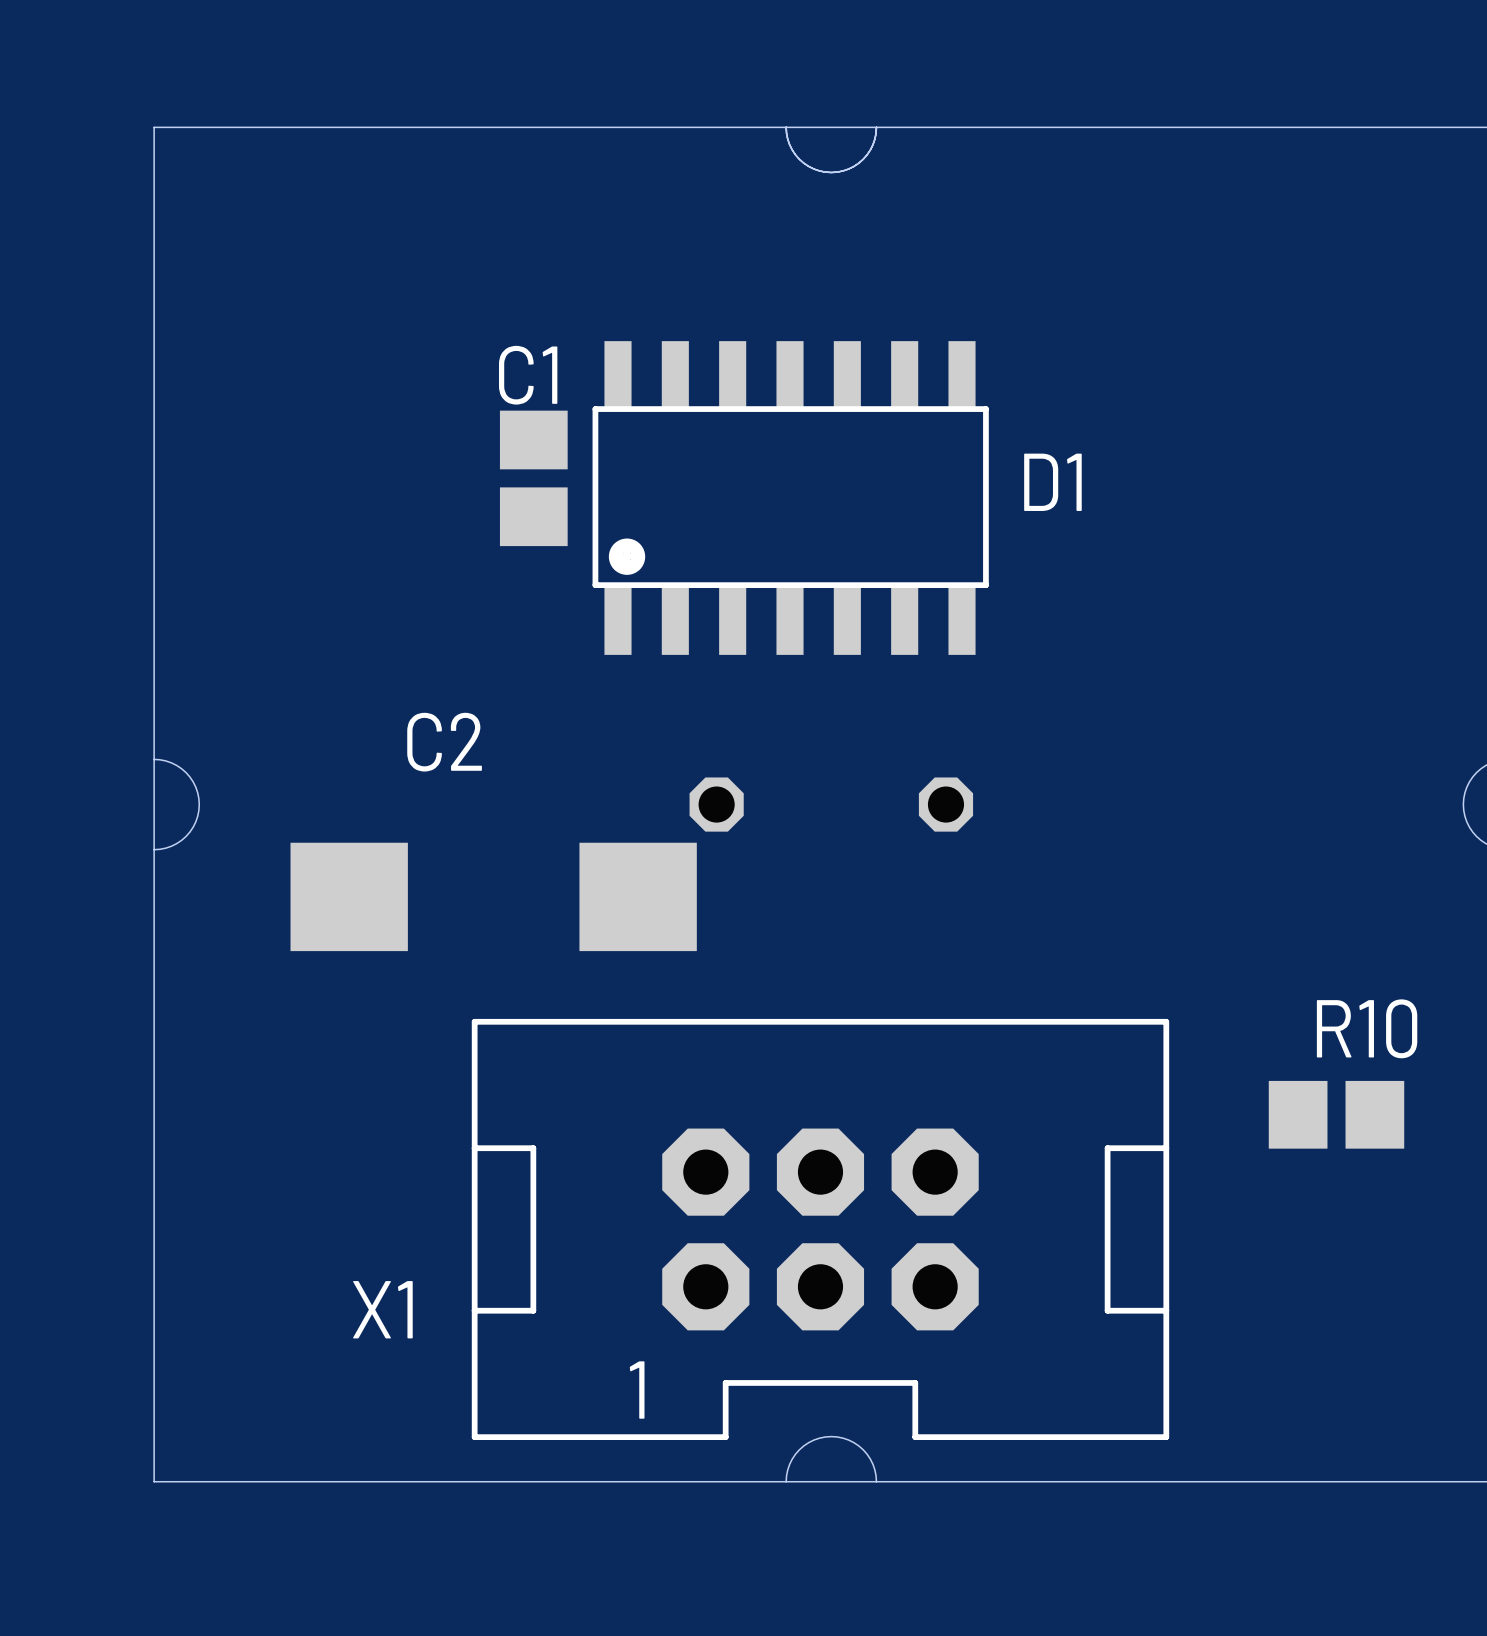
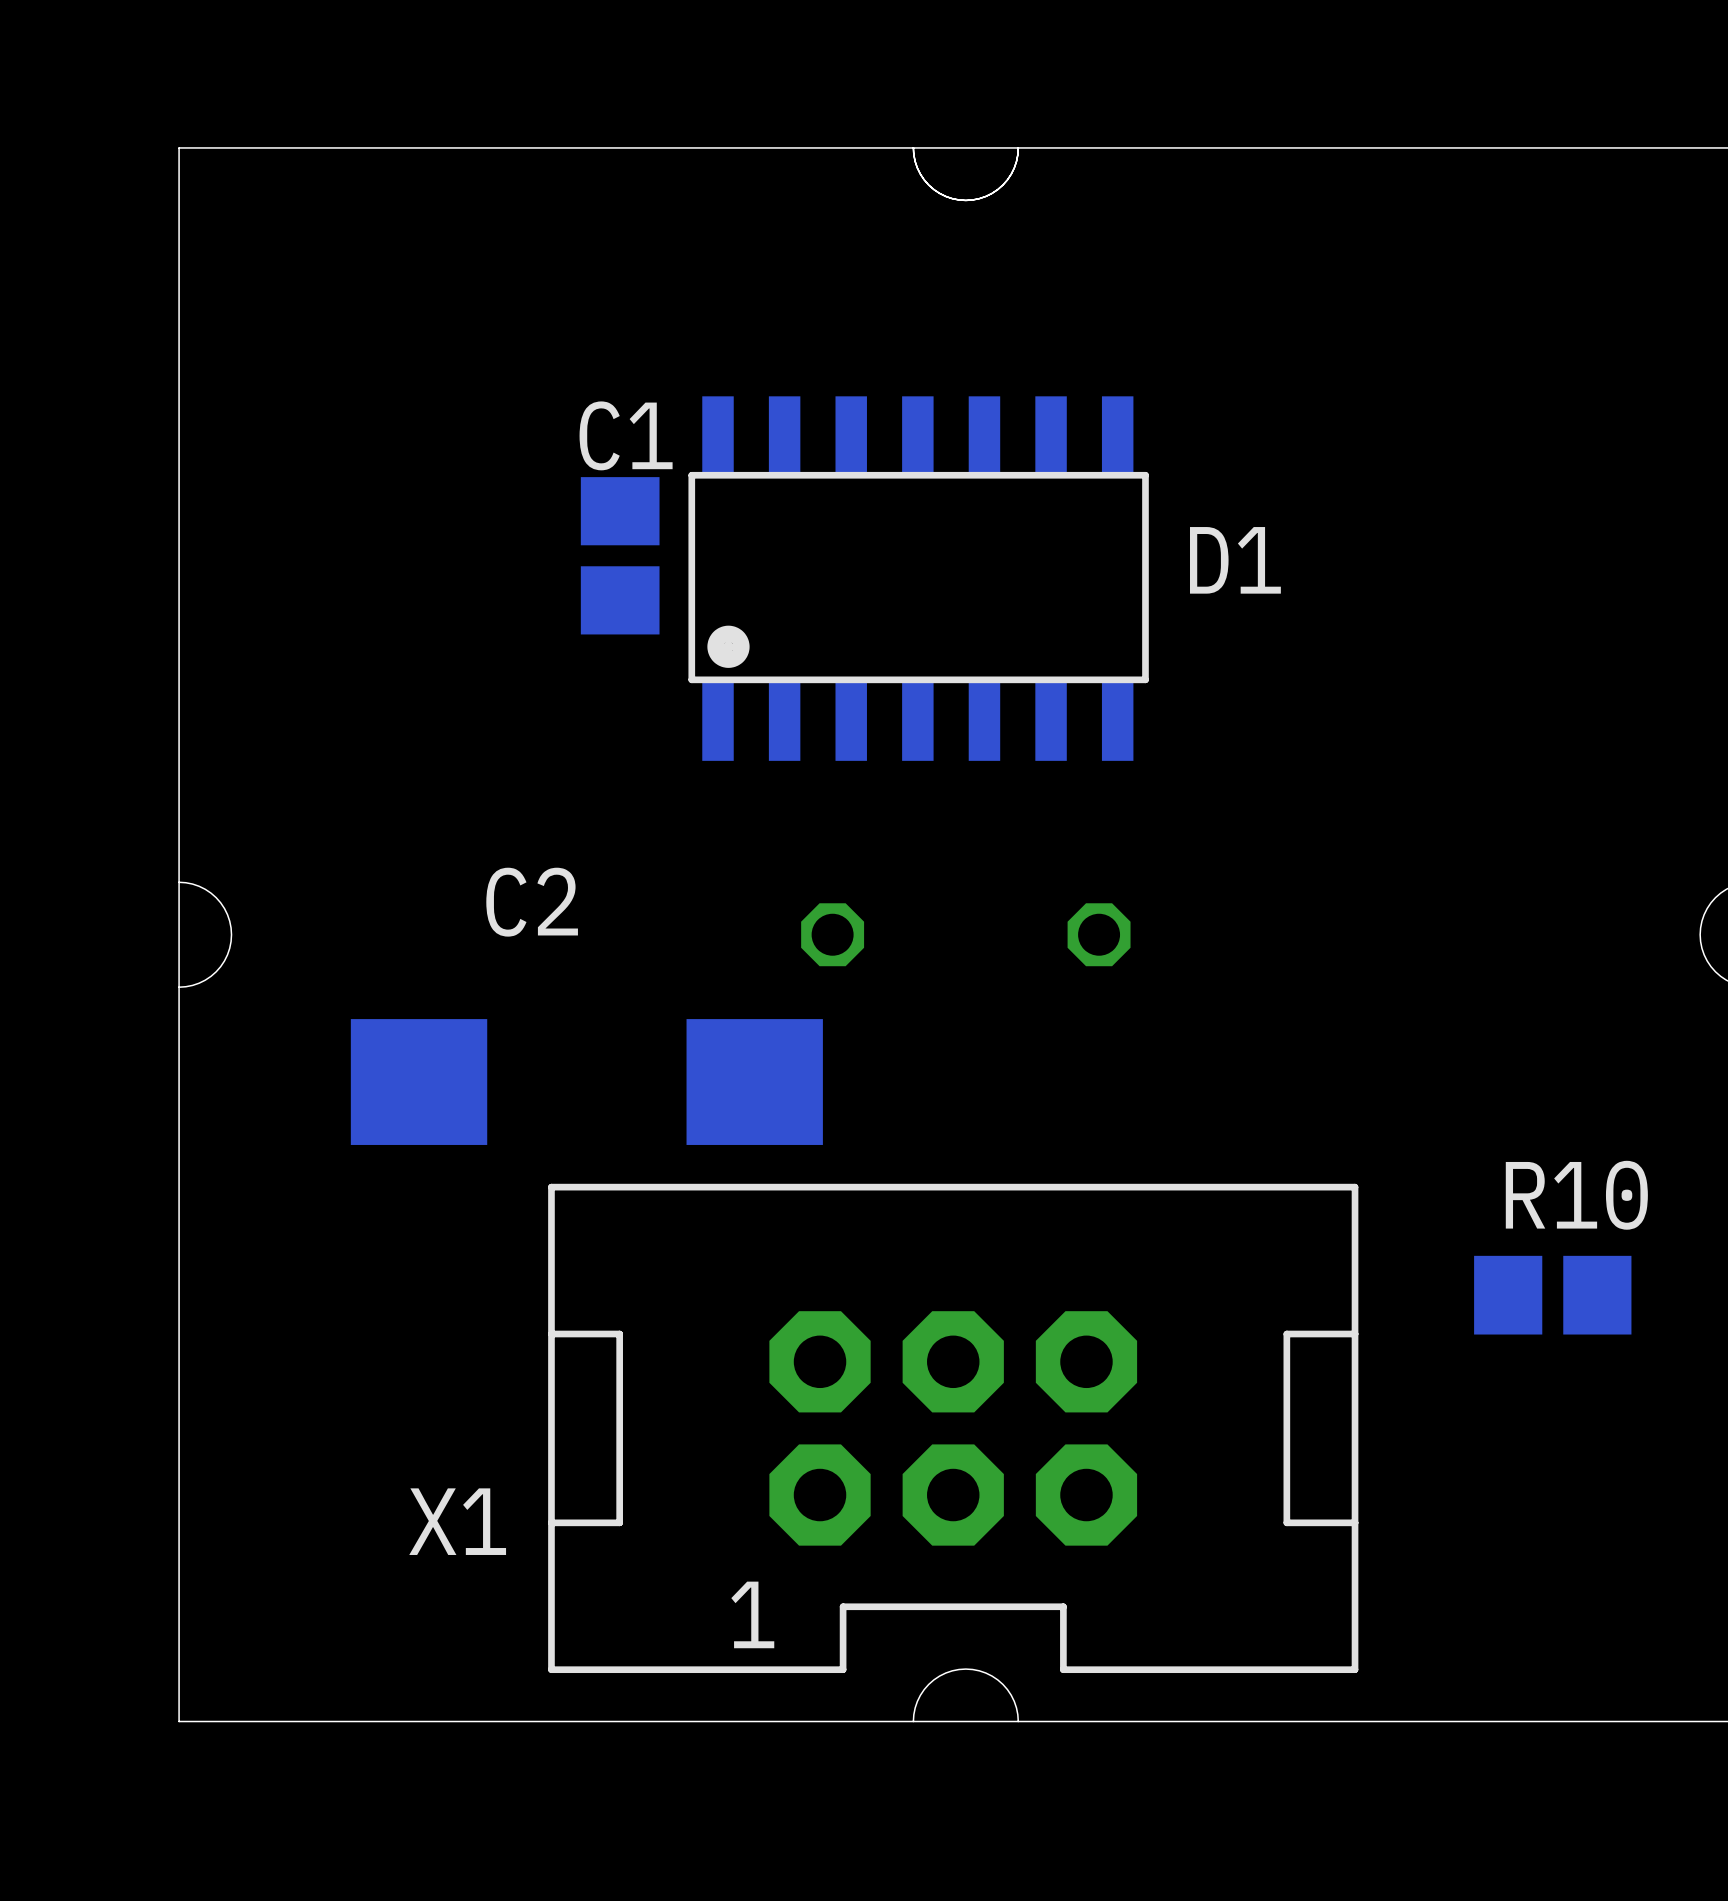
C2 position: (493, 896) -> (586, 1082)

